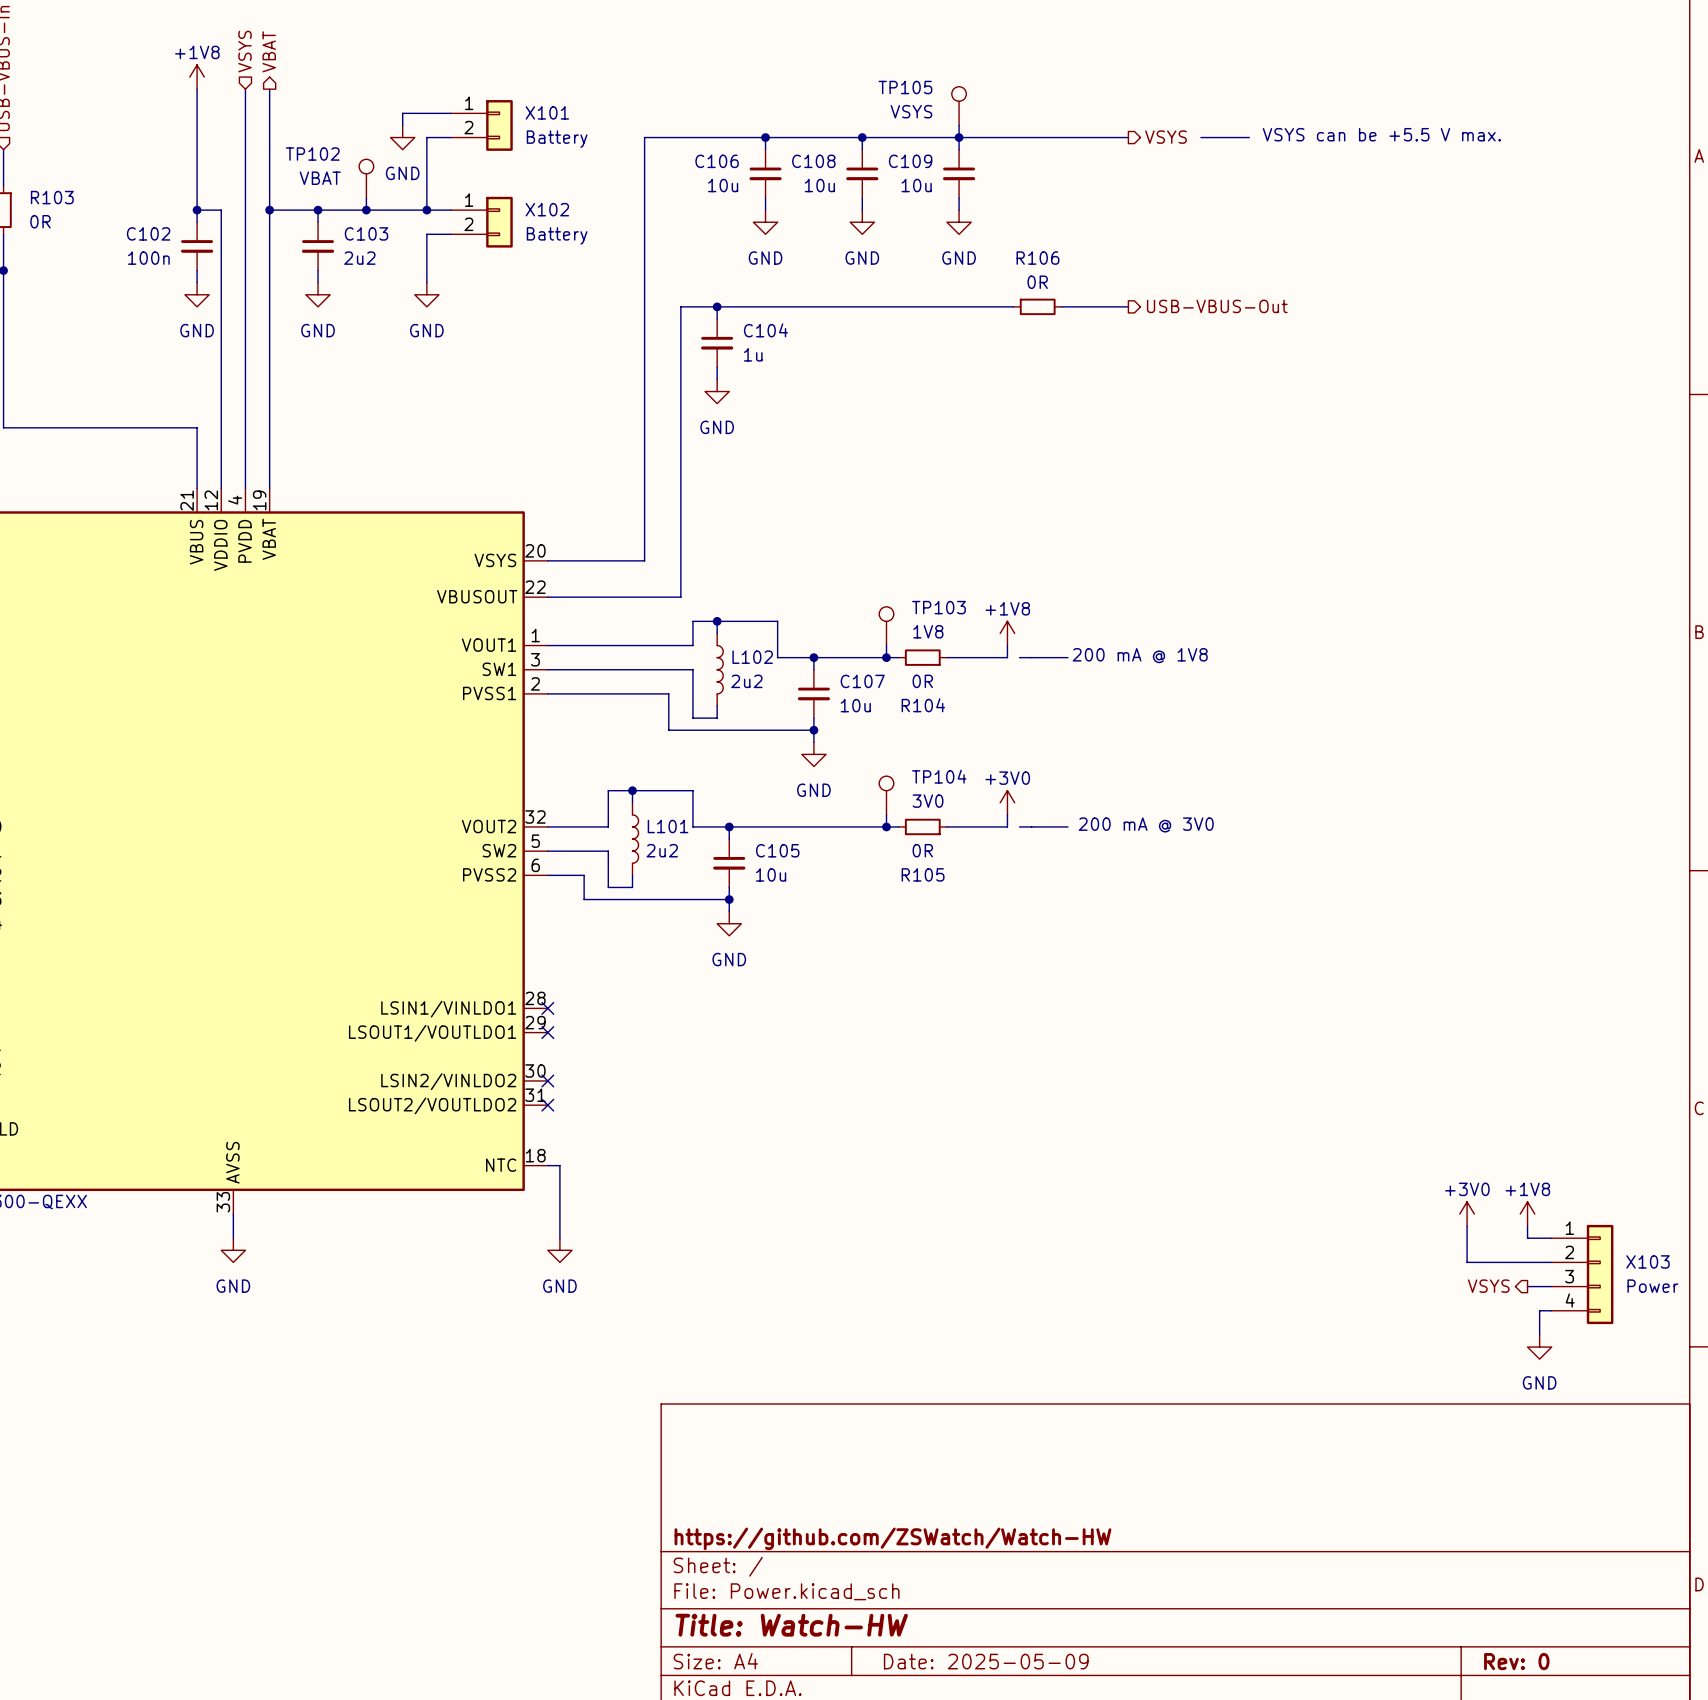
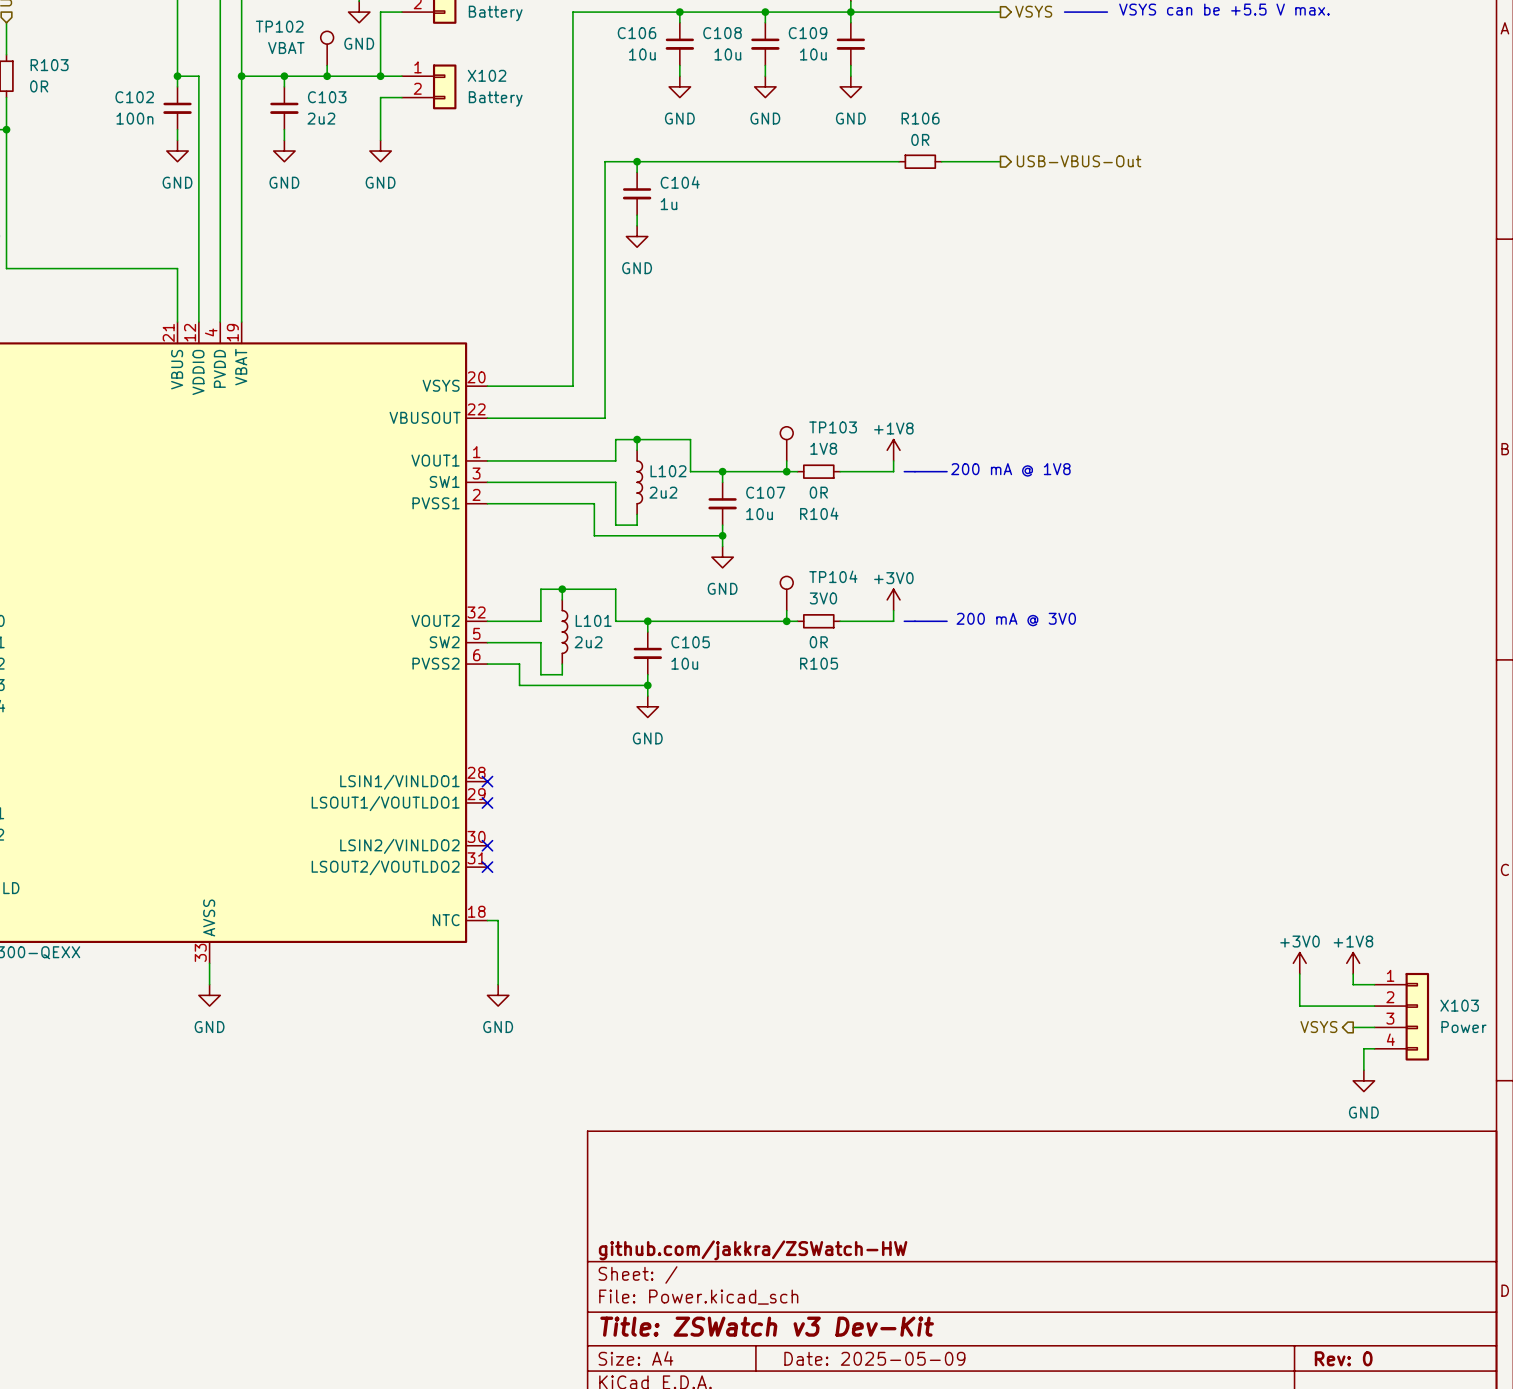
title block: https://github.com/ZSWatch/Watch-HW (892, 1538) -> github.com/jakkra/ZSWatch-HW (753, 1250)
title block: Title: Watch-HW (791, 1625) -> Title: ZSWatch v3 Dev-Kit (767, 1326)

